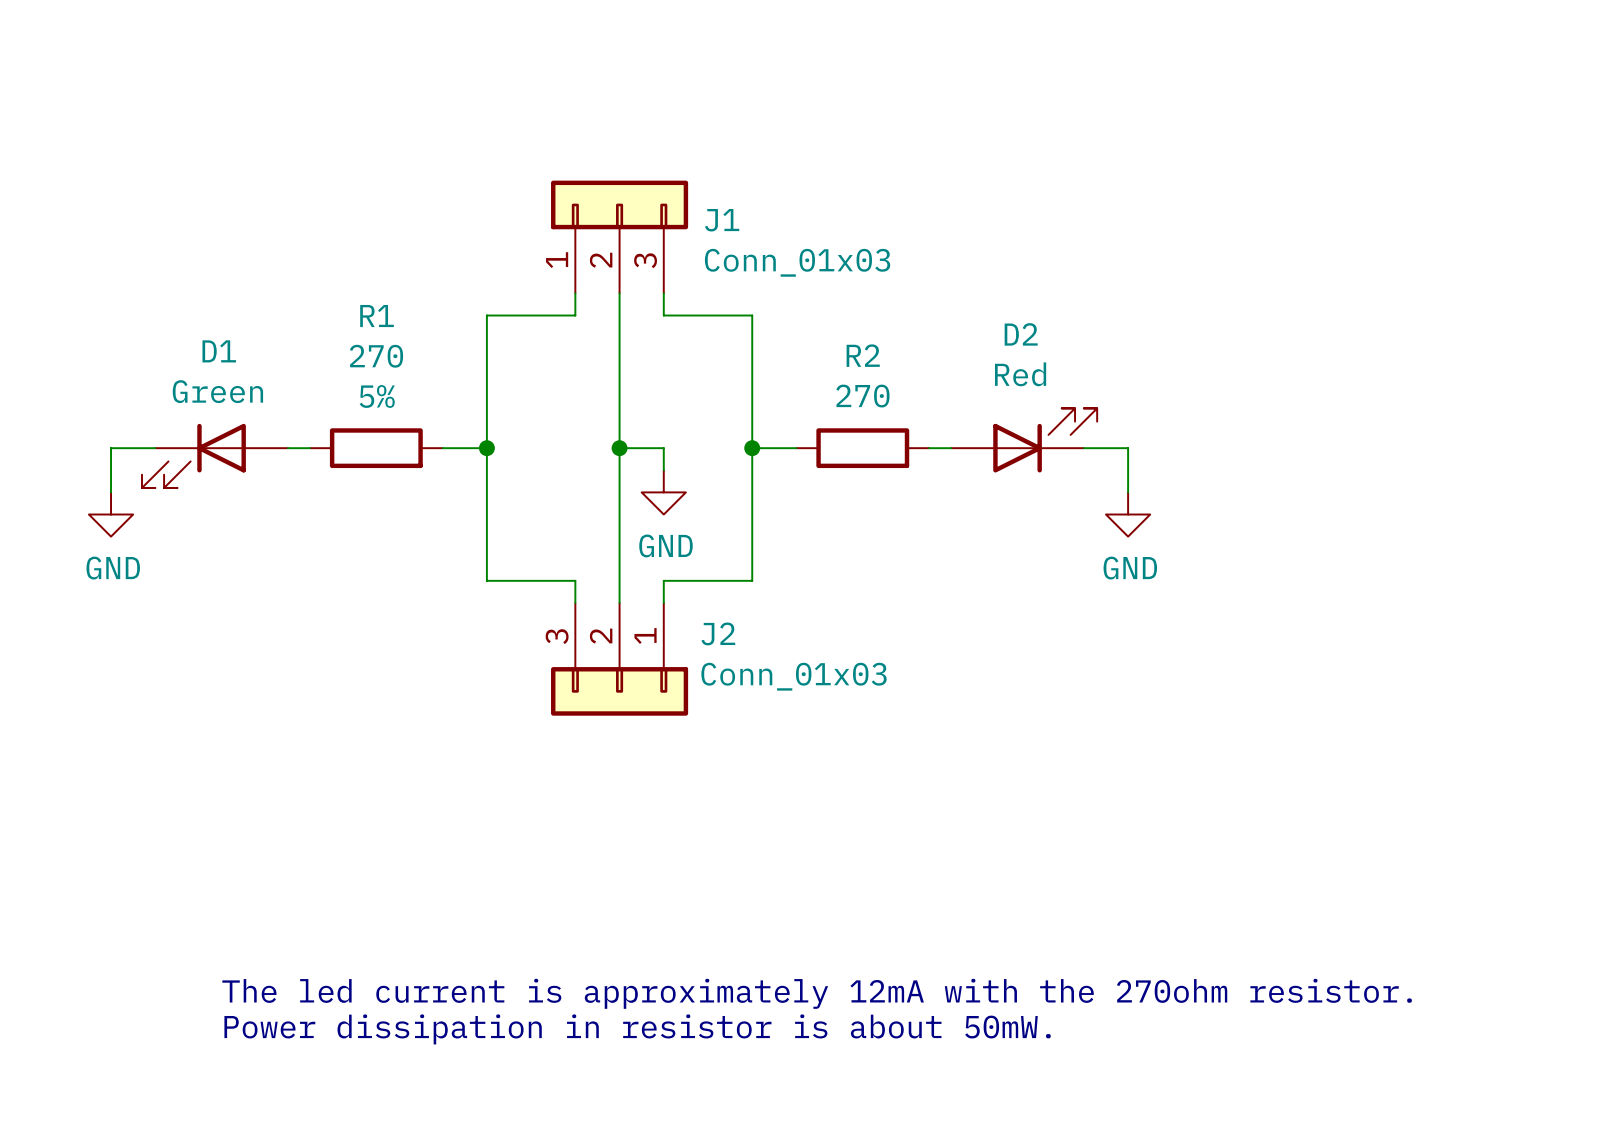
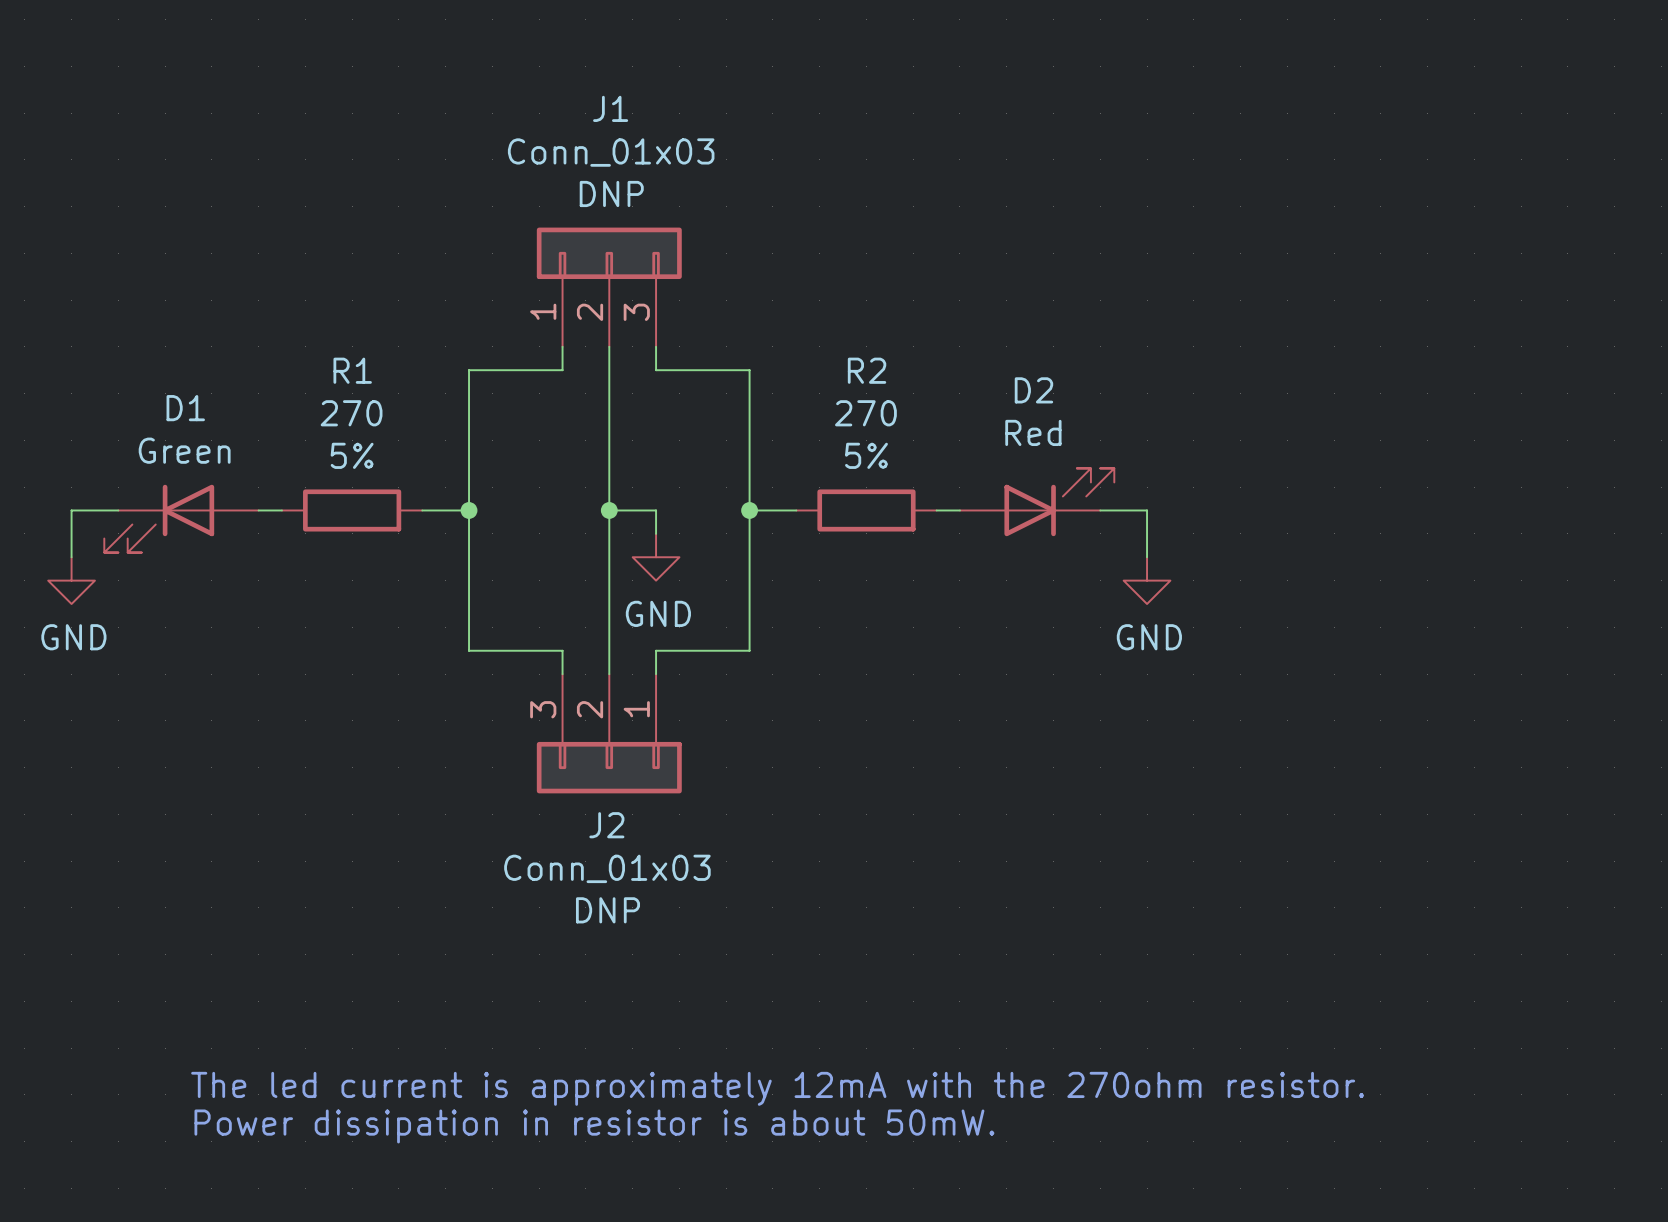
J1 text: none -> DNP (611, 193)
J1 name position: J1 (722, 220) -> J1 (610, 108)
J1 value position: Conn_01x03 (797, 262) -> Conn_01x03 (611, 152)
R2 name position: R2 (863, 355) -> R2 (867, 370)
R2 value position: 270 (862, 396) -> 270 (865, 413)
R2 text: none -> 5% (866, 455)
J2 name position: J2 (718, 633) -> J2 (606, 825)
J2 value position: Conn_01x03 (794, 676) -> Conn_01x03 (607, 868)
J2 text: none -> DNP (607, 910)

